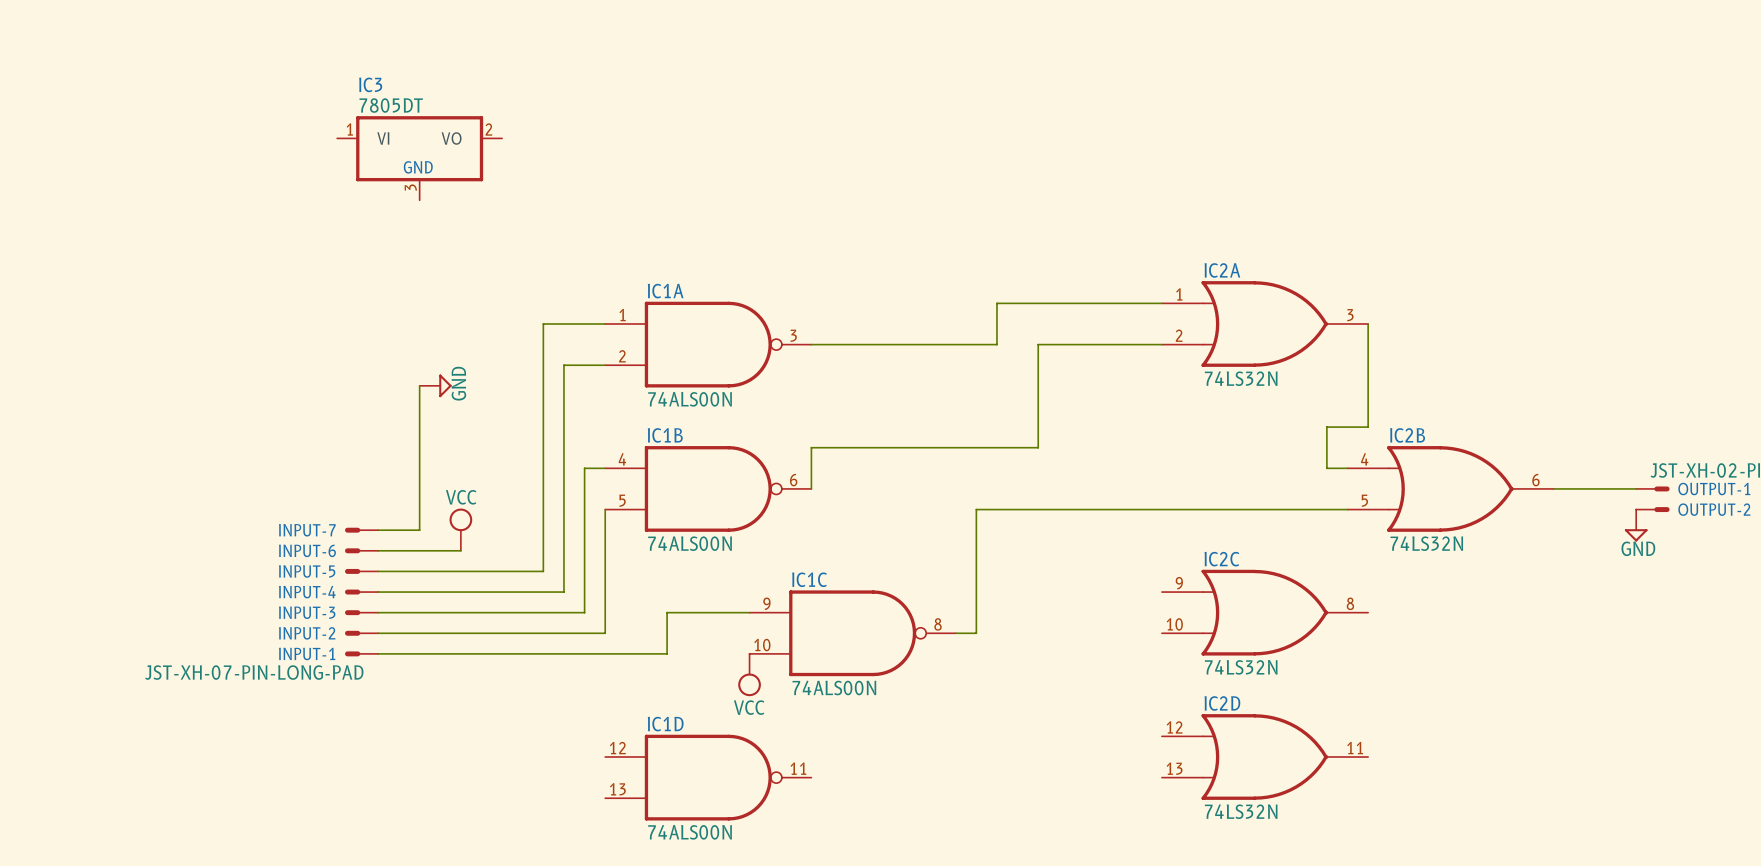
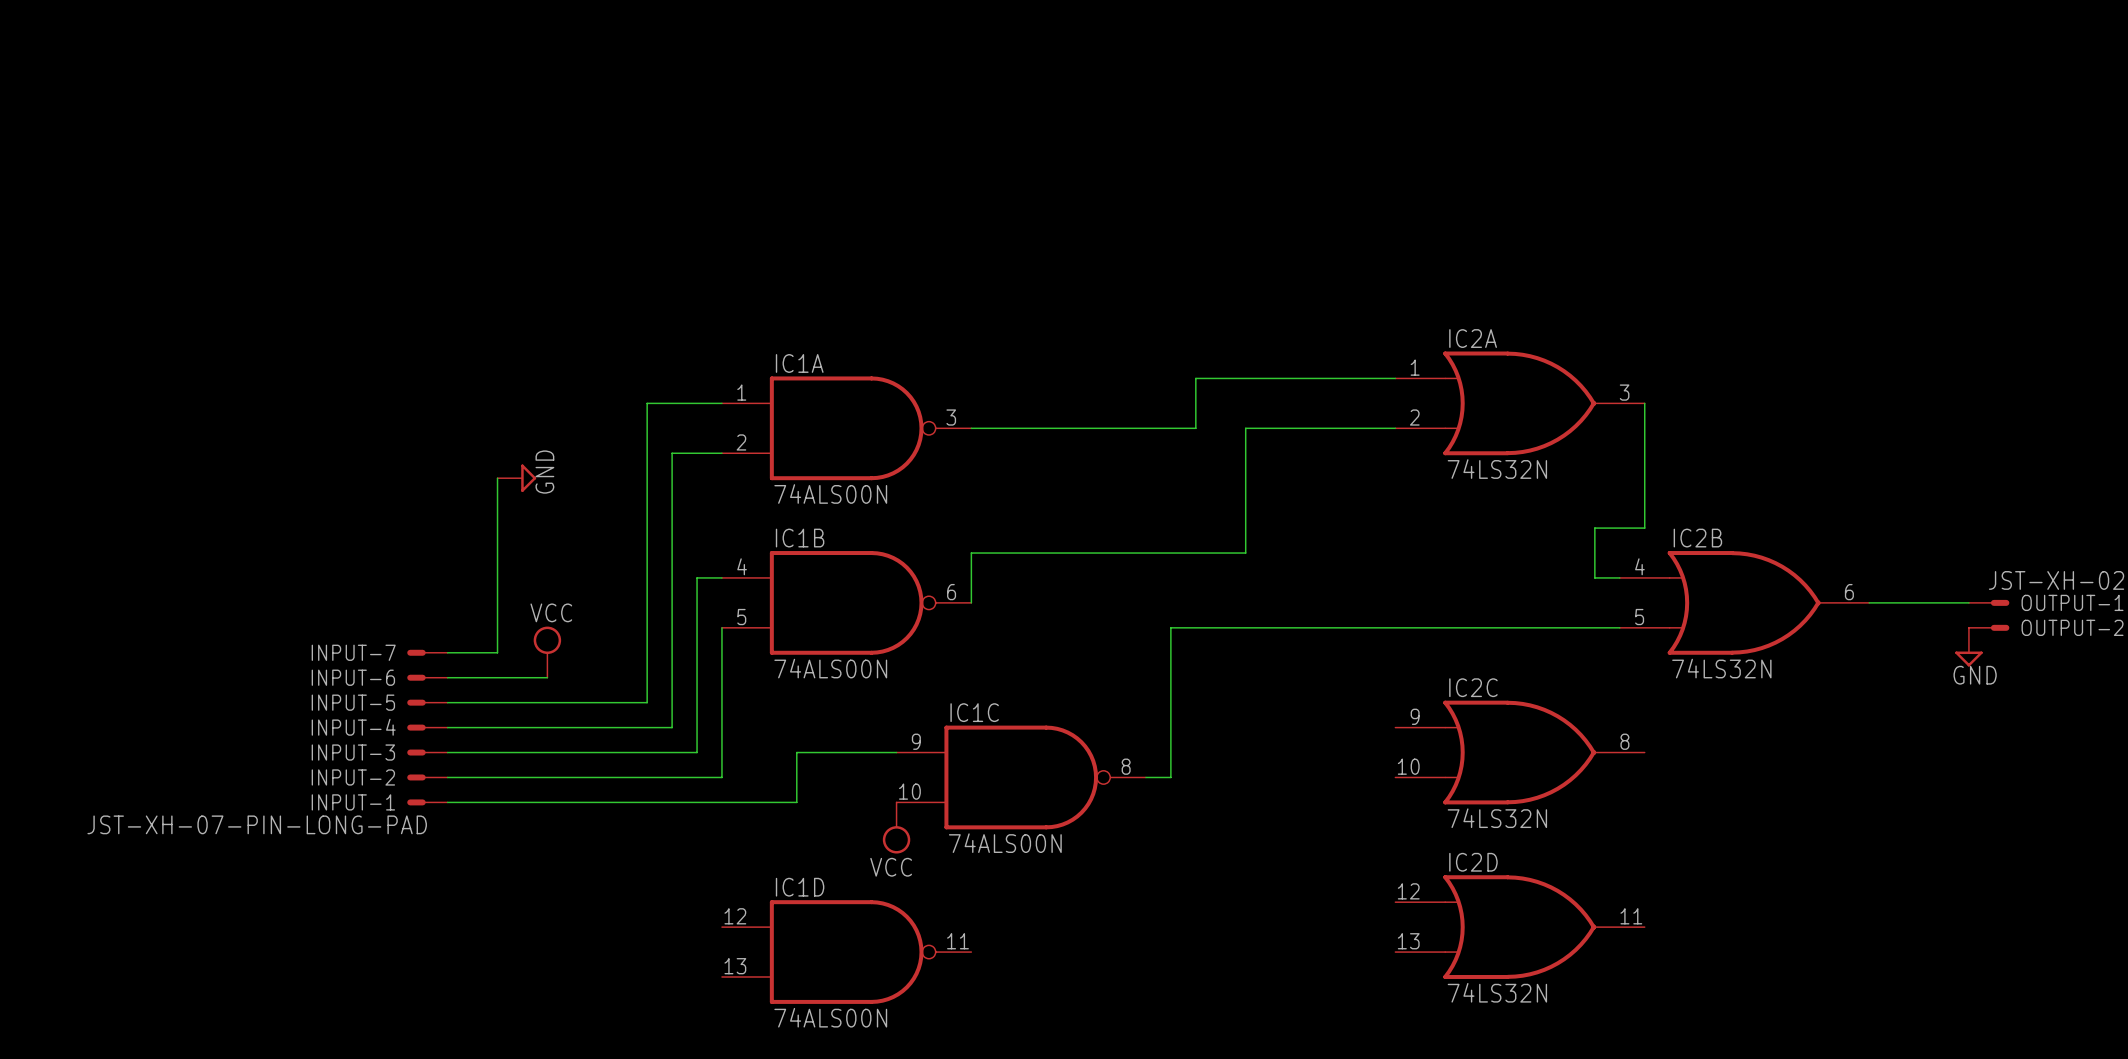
IC3: 7805DT (419, 158) -> none

